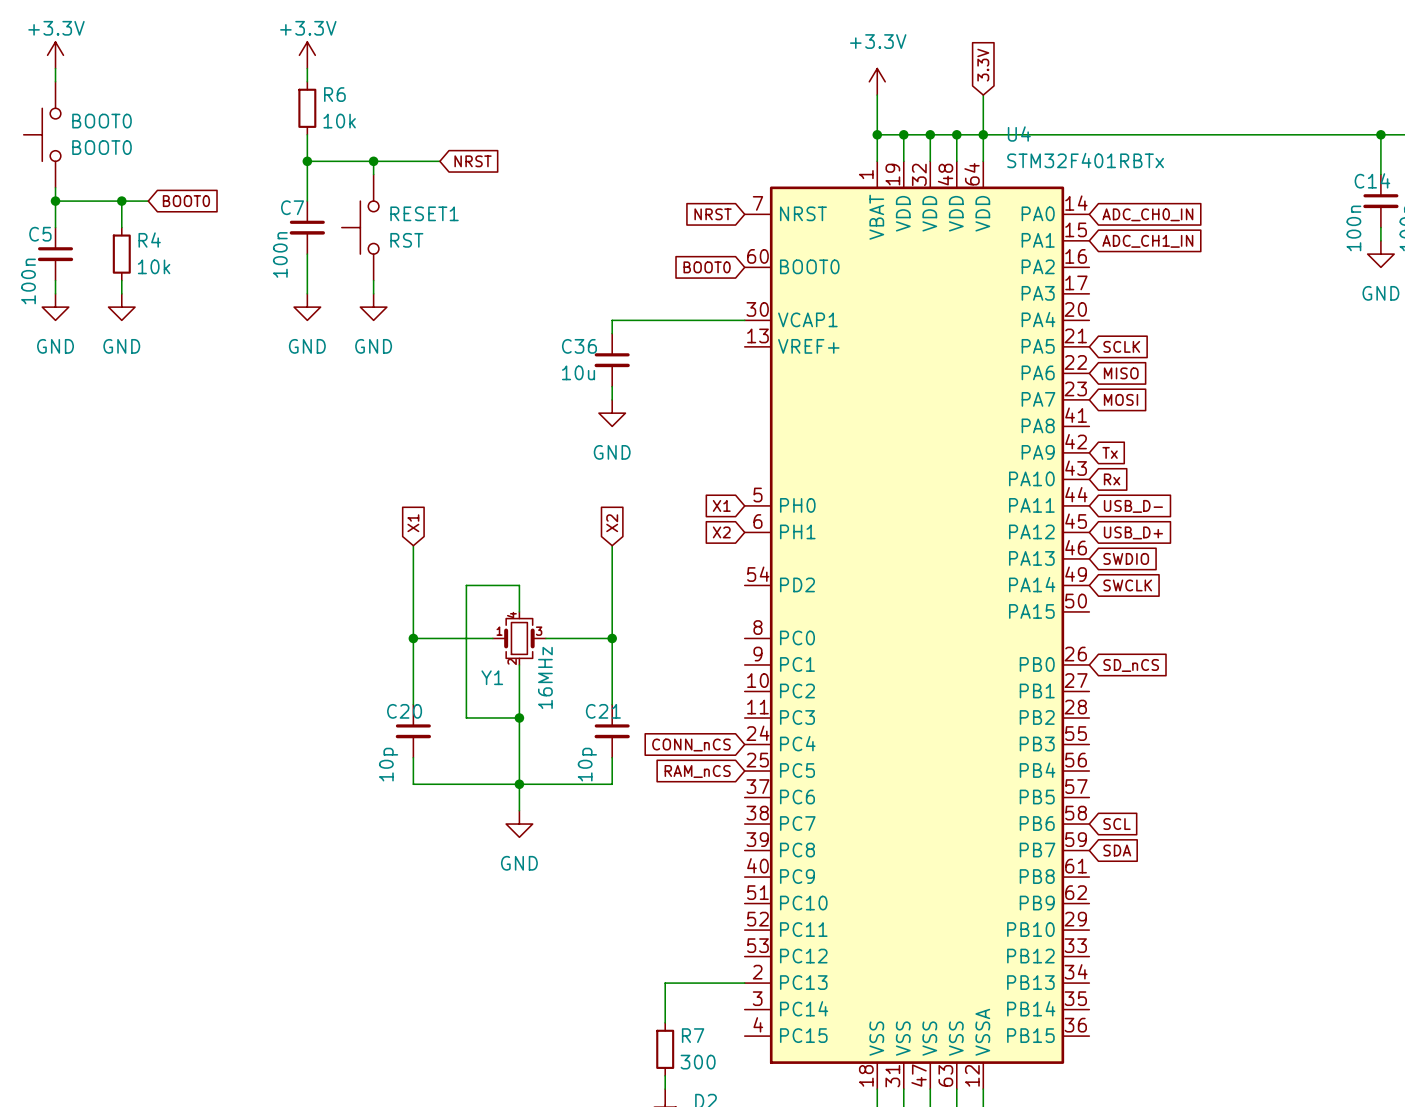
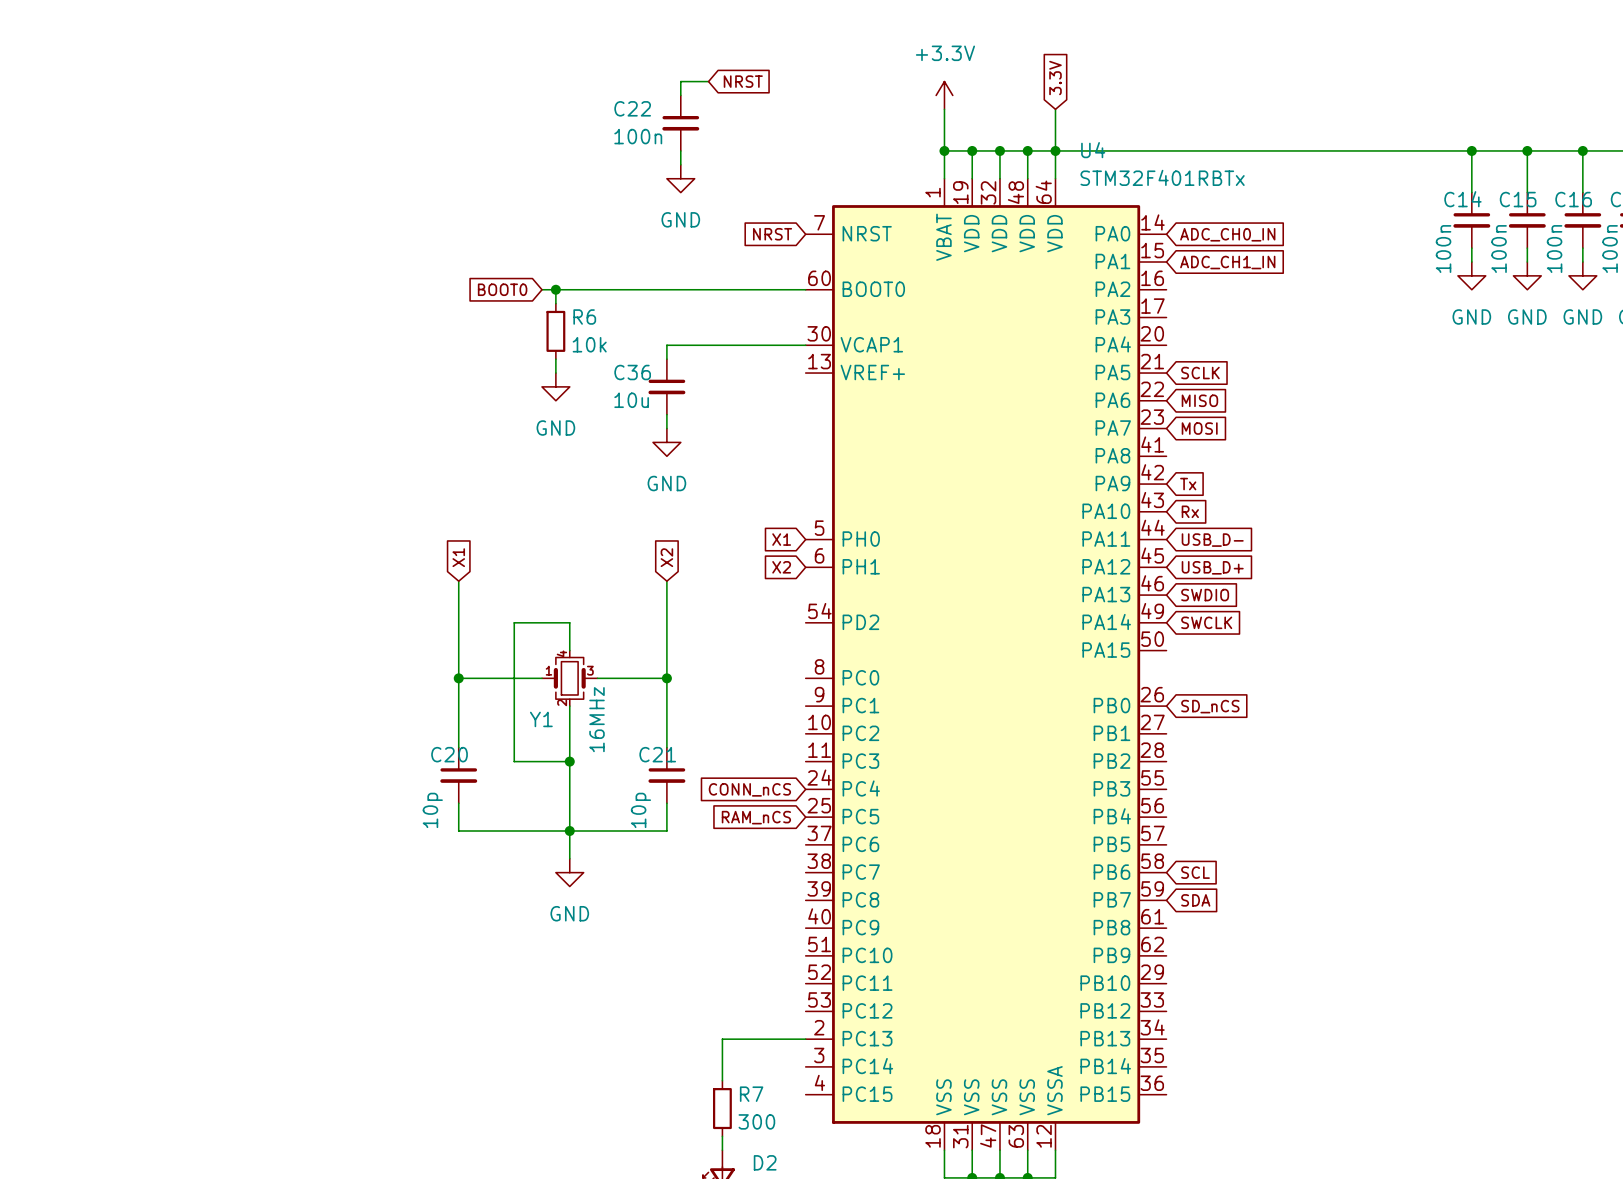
power symbol: +3.3V (55, 55) -> none
power symbol: +3.3V (307, 55) -> none
wire: (55, 68) (55, 81) -> none
wire: (307, 68) (307, 81) -> none
wire: none -> (708, 81) (680, 81) (680, 95)
R6 position: (307, 108) -> (555, 331)
C22: none -> 100n (680, 123)
BOOT0: BOOT0 (42, 134) -> none
wire: (307, 134) (307, 201) -> none
wire: none -> (680, 150) (680, 164)
wire: (307, 161) (439, 161) -> none
junction: (307, 161) -> none
wire: (373, 161) (373, 174) -> (555, 359) (555, 373)
junction: (373, 161) -> none
global label position: NRST (473, 161) -> NRST (743, 81)
power symbol: none -> GND (680, 178)
wire: (55, 187) (55, 227) -> none
wire: (55, 201) (148, 201) -> none
junction: (55, 201) -> none
wire: (121, 201) (121, 227) -> none
junction: (121, 201) -> none
global label: BOOT0 (186, 201) -> none
C7: 100n (307, 227) -> none
RESET1: RST (360, 227) -> none
C5: 100n (55, 254) -> none
R4: 10k (121, 254) -> none
wire: (307, 254) (307, 293) -> none
global label: none -> BOOT0 (502, 289)
wire: none -> (542, 289) (805, 289)
junction: none -> (555, 289)
global label: BOOT0 (707, 267) -> none
wire: (55, 280) (55, 293) -> none
wire: (121, 280) (121, 293) -> none
wire: (373, 280) (373, 293) -> (555, 289) (555, 303)
power symbol: GND (55, 307) -> none
power symbol: GND (121, 307) -> none
power symbol: GND (307, 307) -> none
power symbol: GND (373, 307) -> none
power symbol: none -> GND (555, 386)

